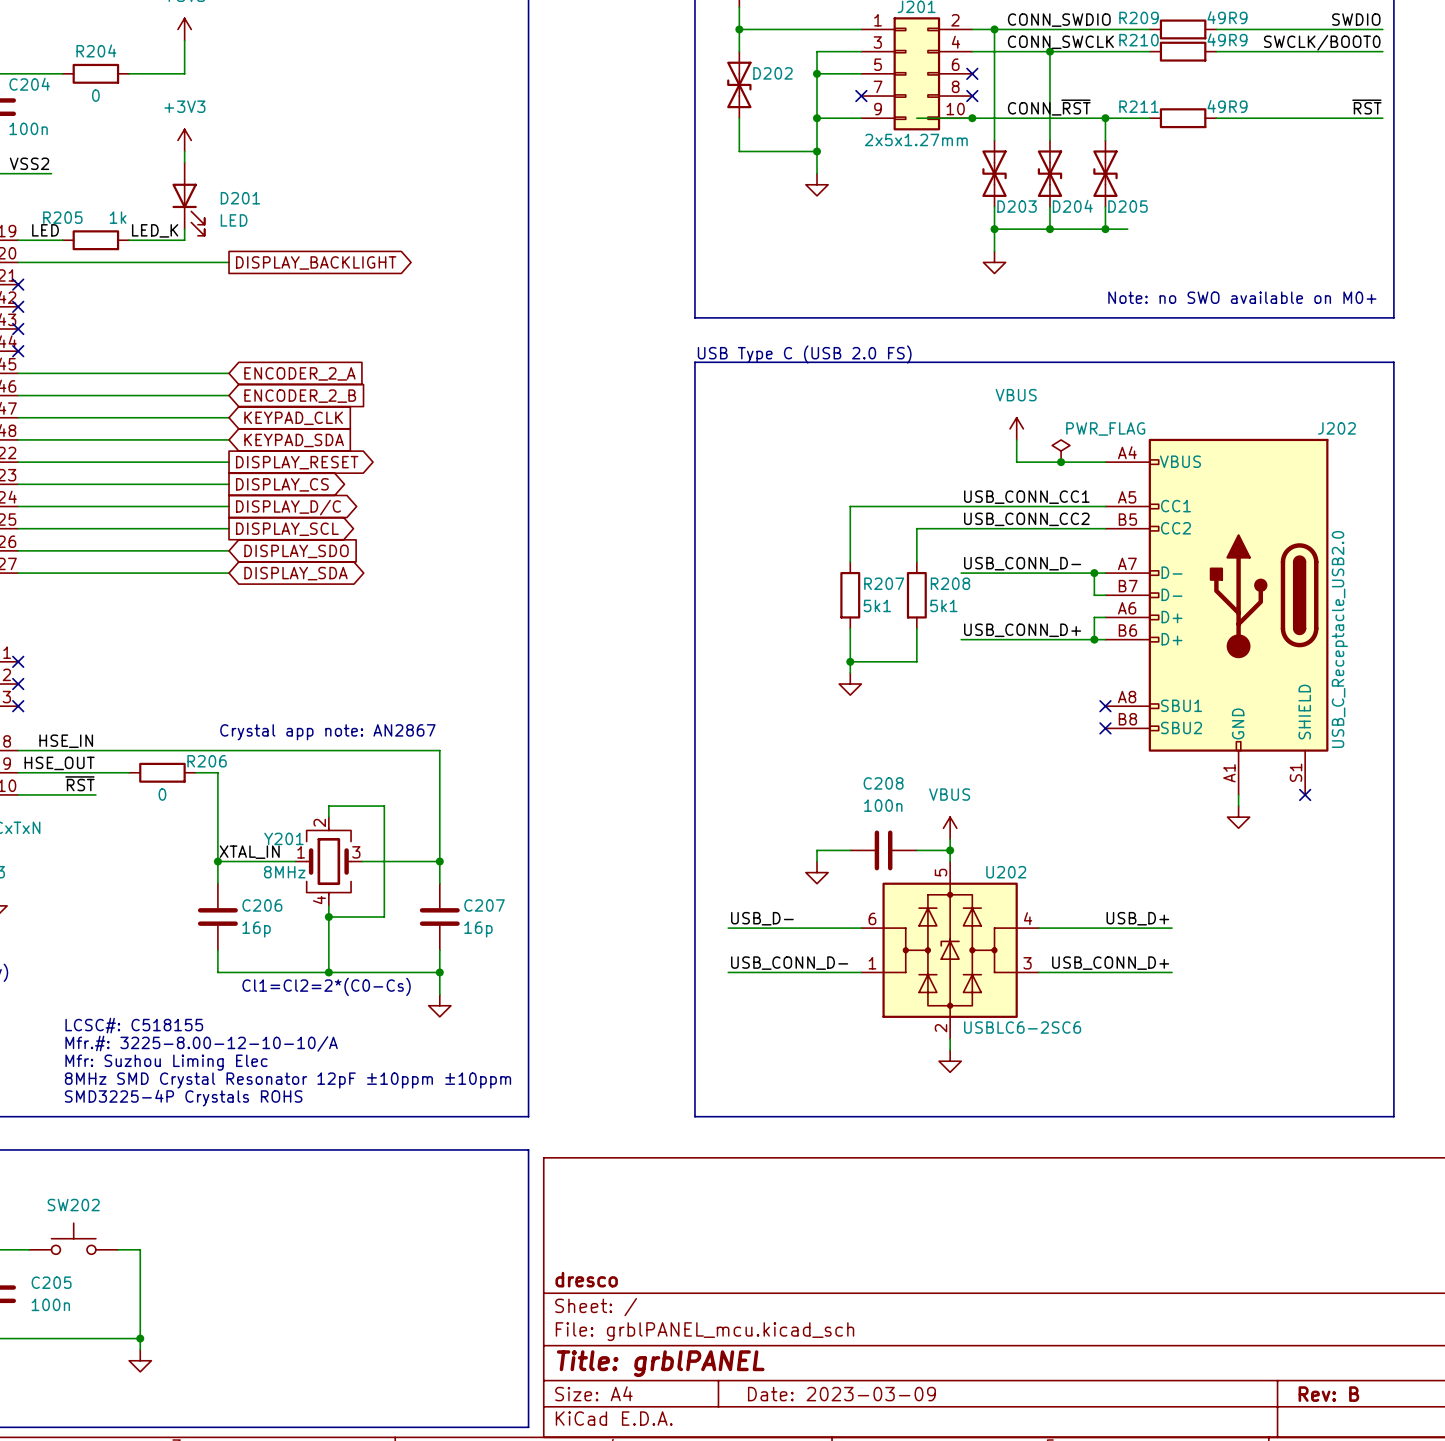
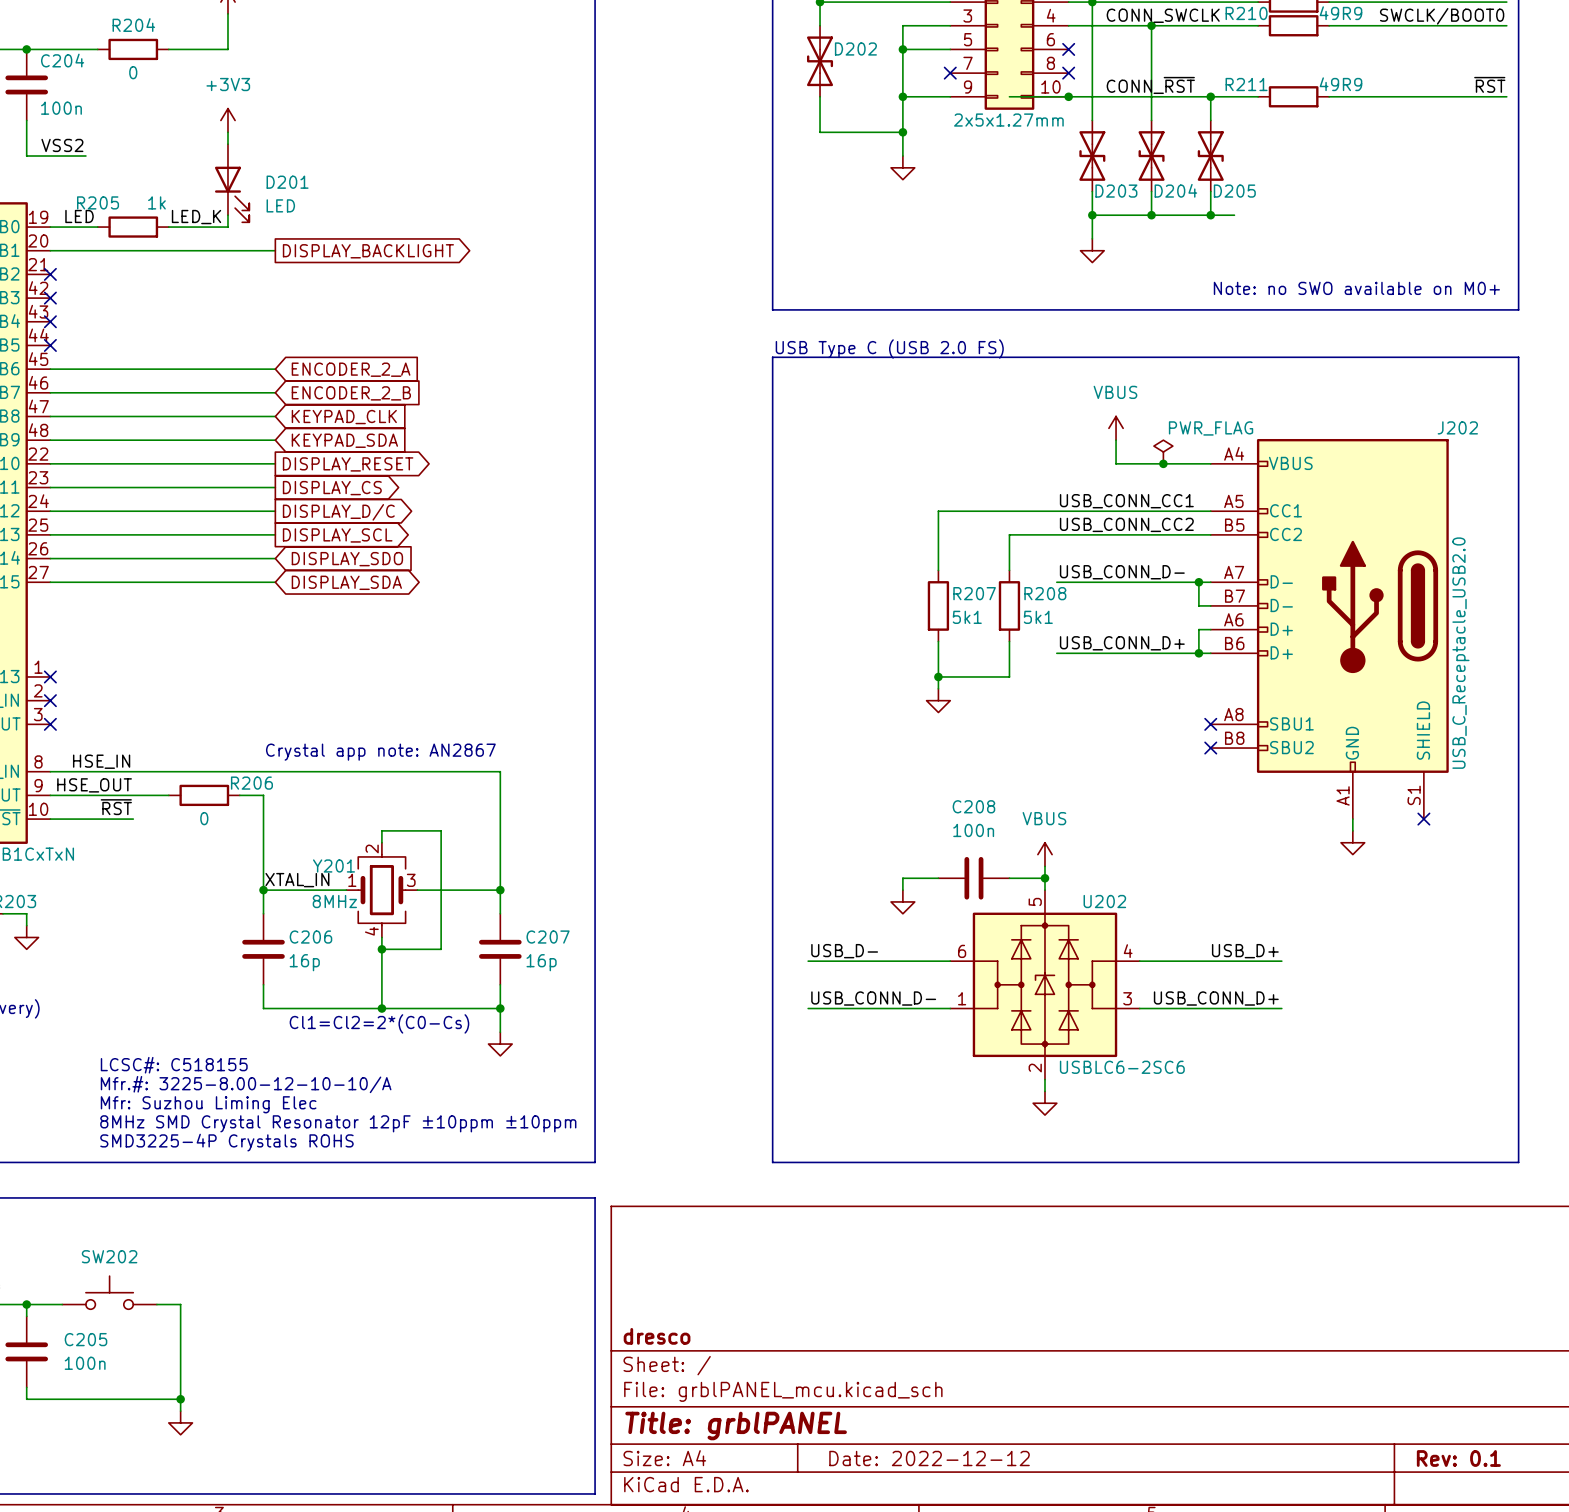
title block: Date: 2023-03-09 (841, 1394) -> Date: 2022-12-12 (929, 1458)
title block: Rev: B (1328, 1394) -> Rev: 0.1 (1458, 1458)

